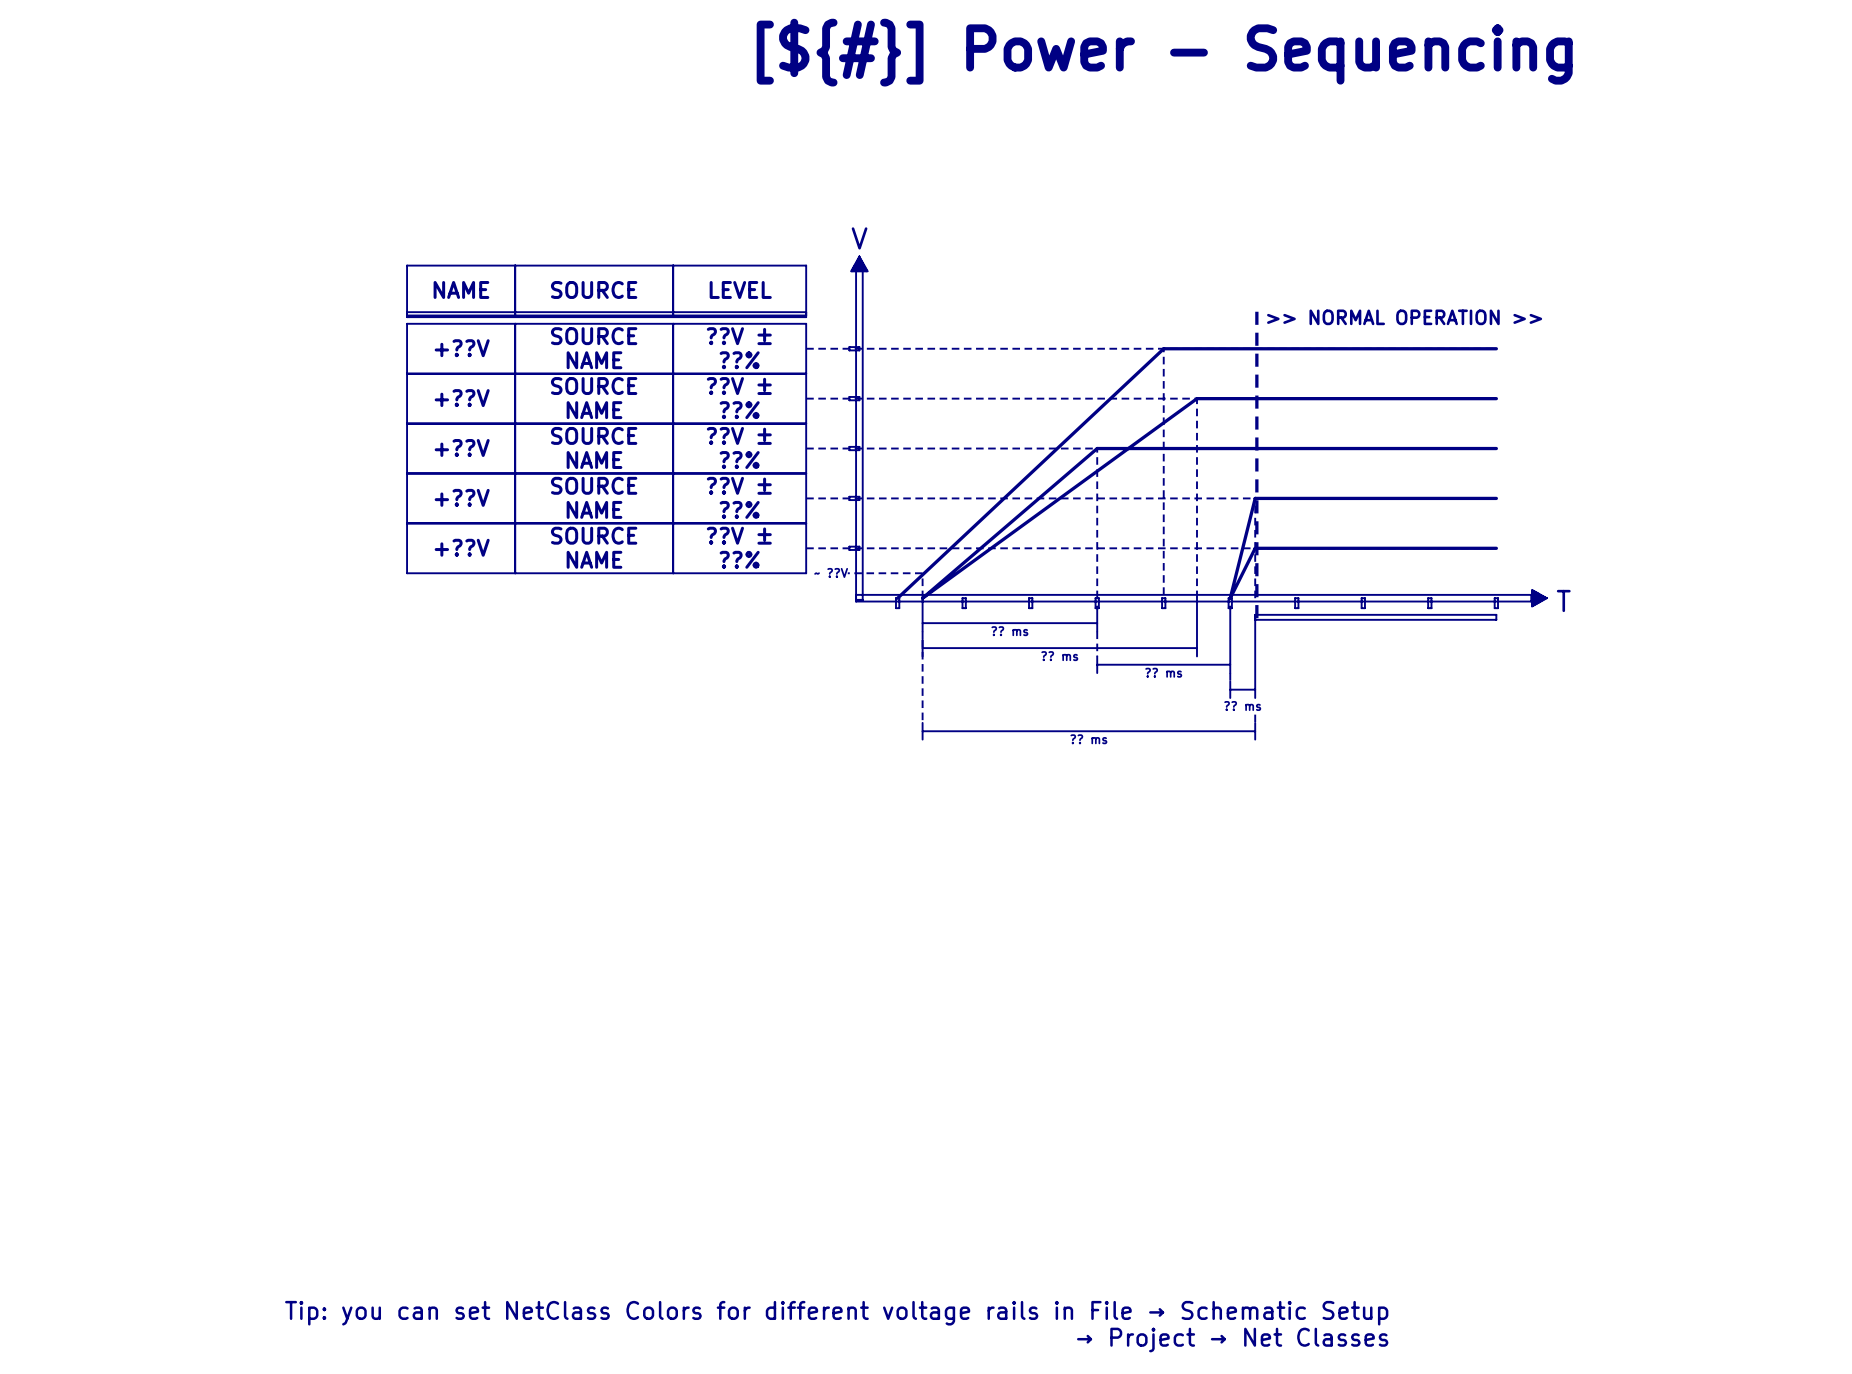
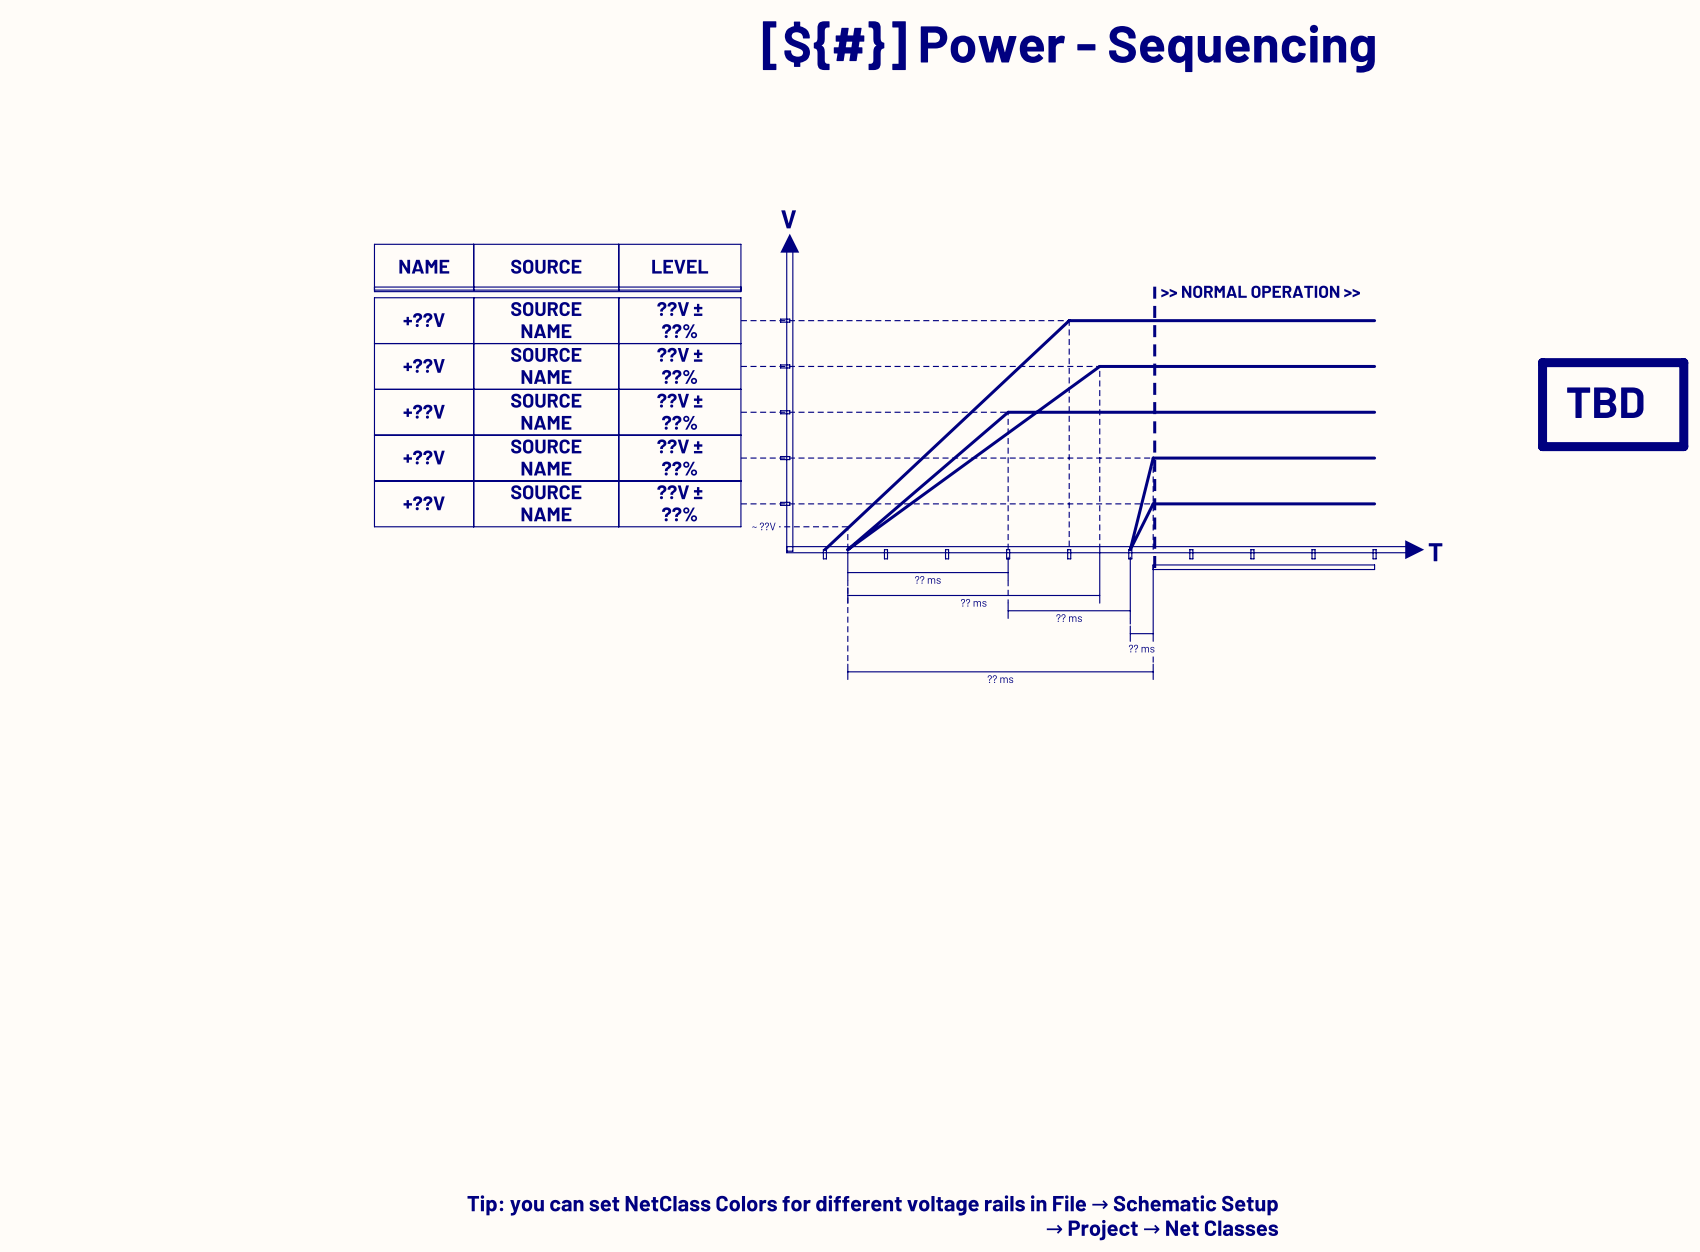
line: none -> (1542, 362) (1683, 362) (1683, 446) (1542, 446) (1542, 362)
text: none -> TBD (1605, 402)

